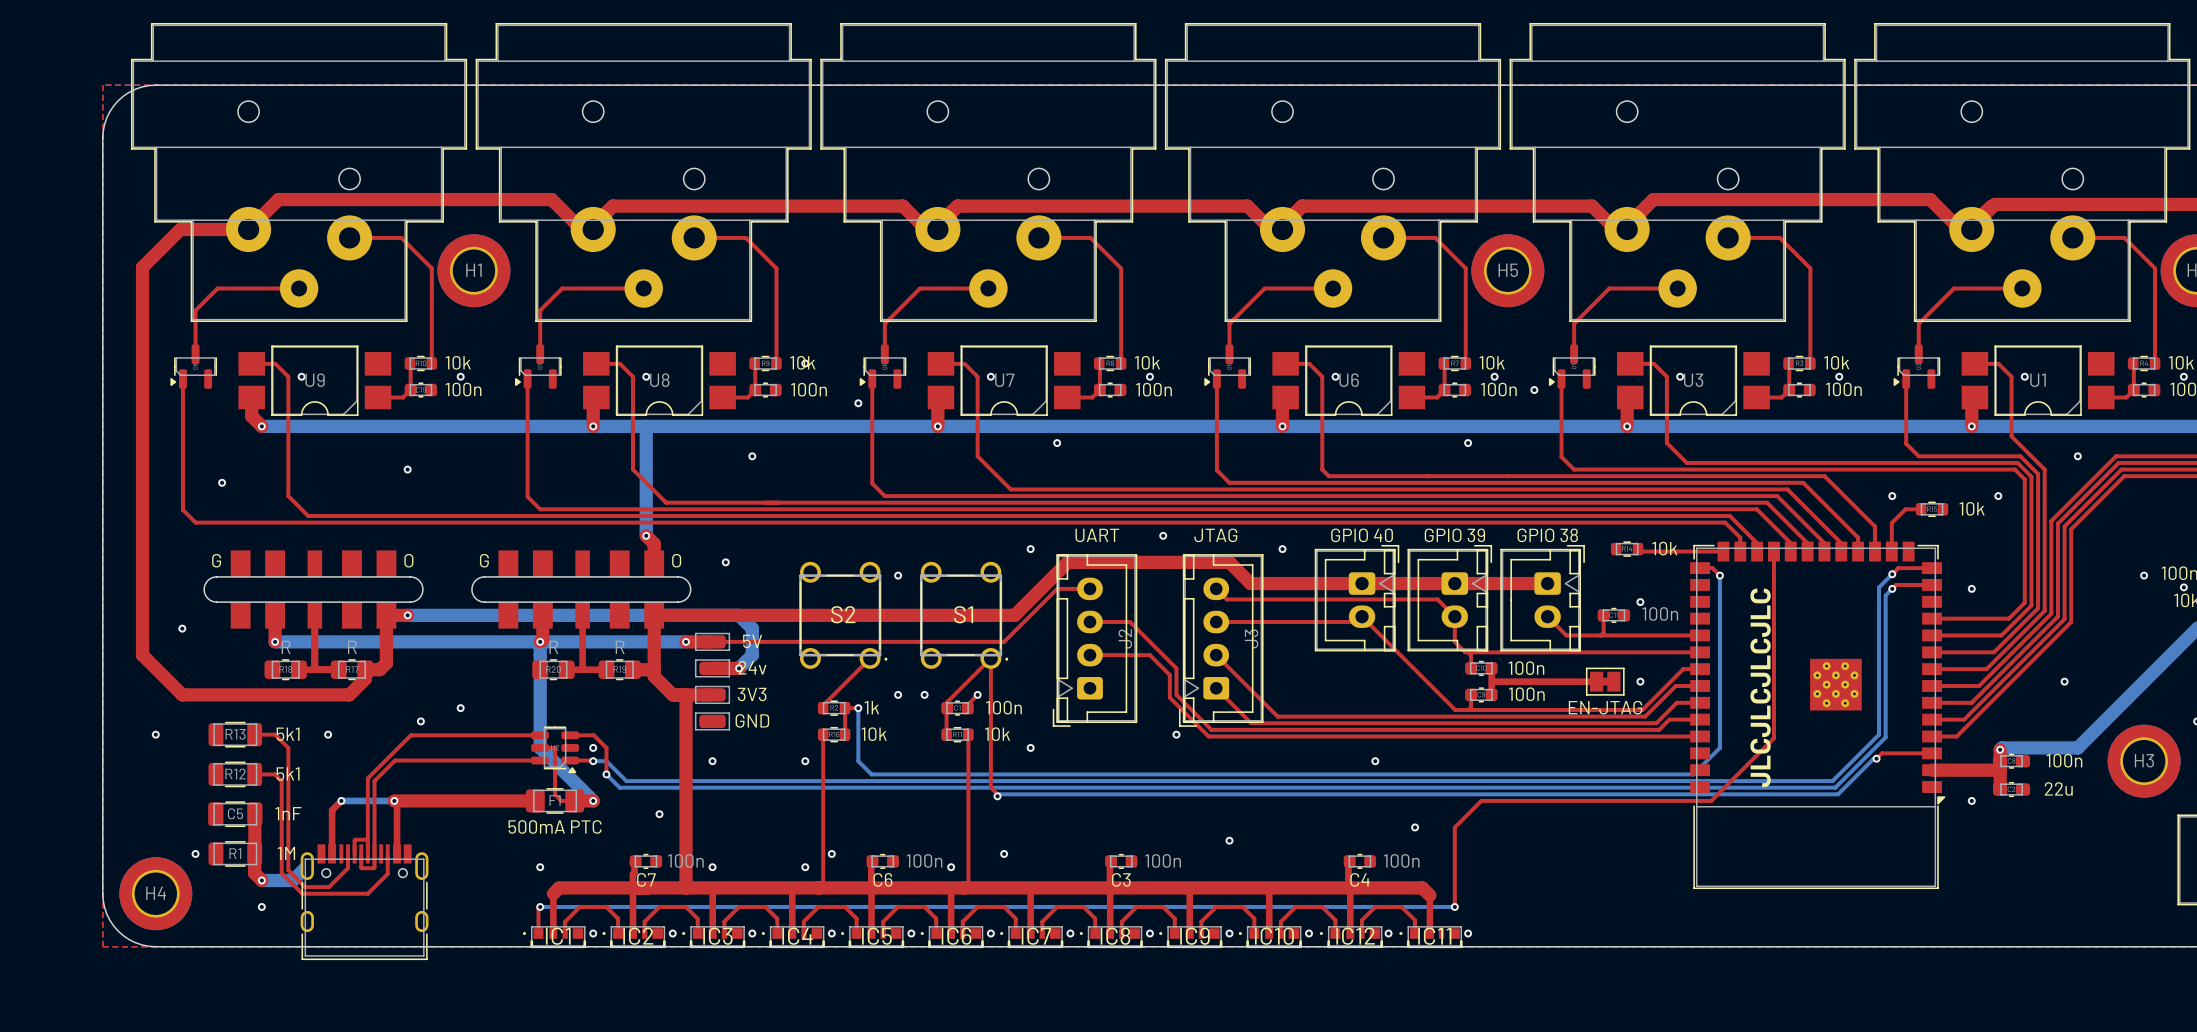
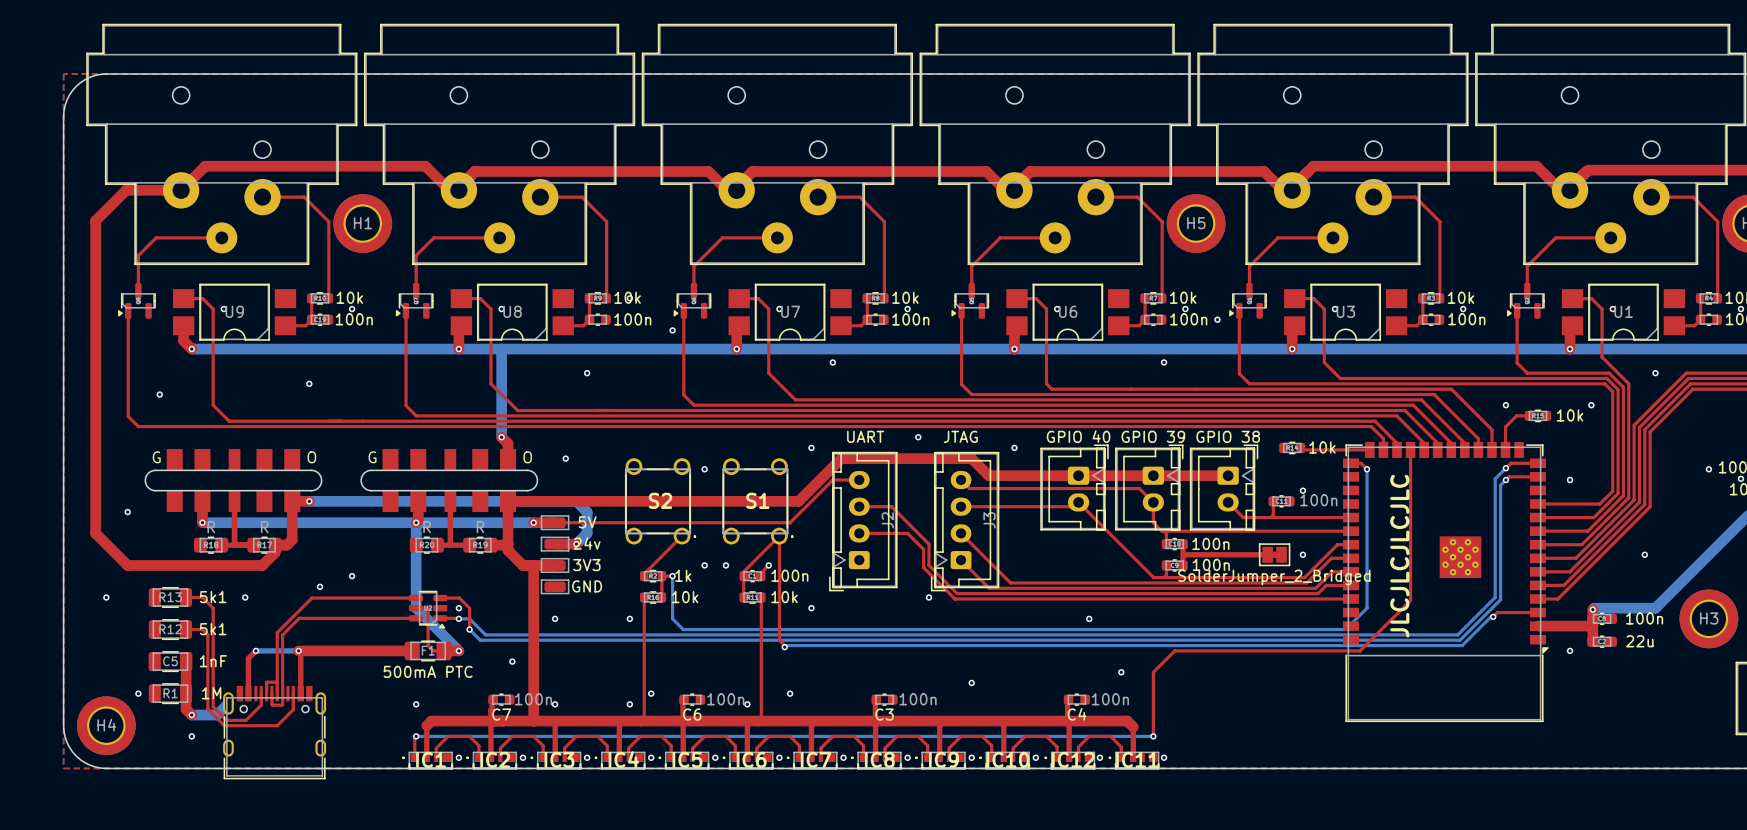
part value: EN-JTAG (1605, 707) -> SolderJumper_2_Bridged (1274, 577)

